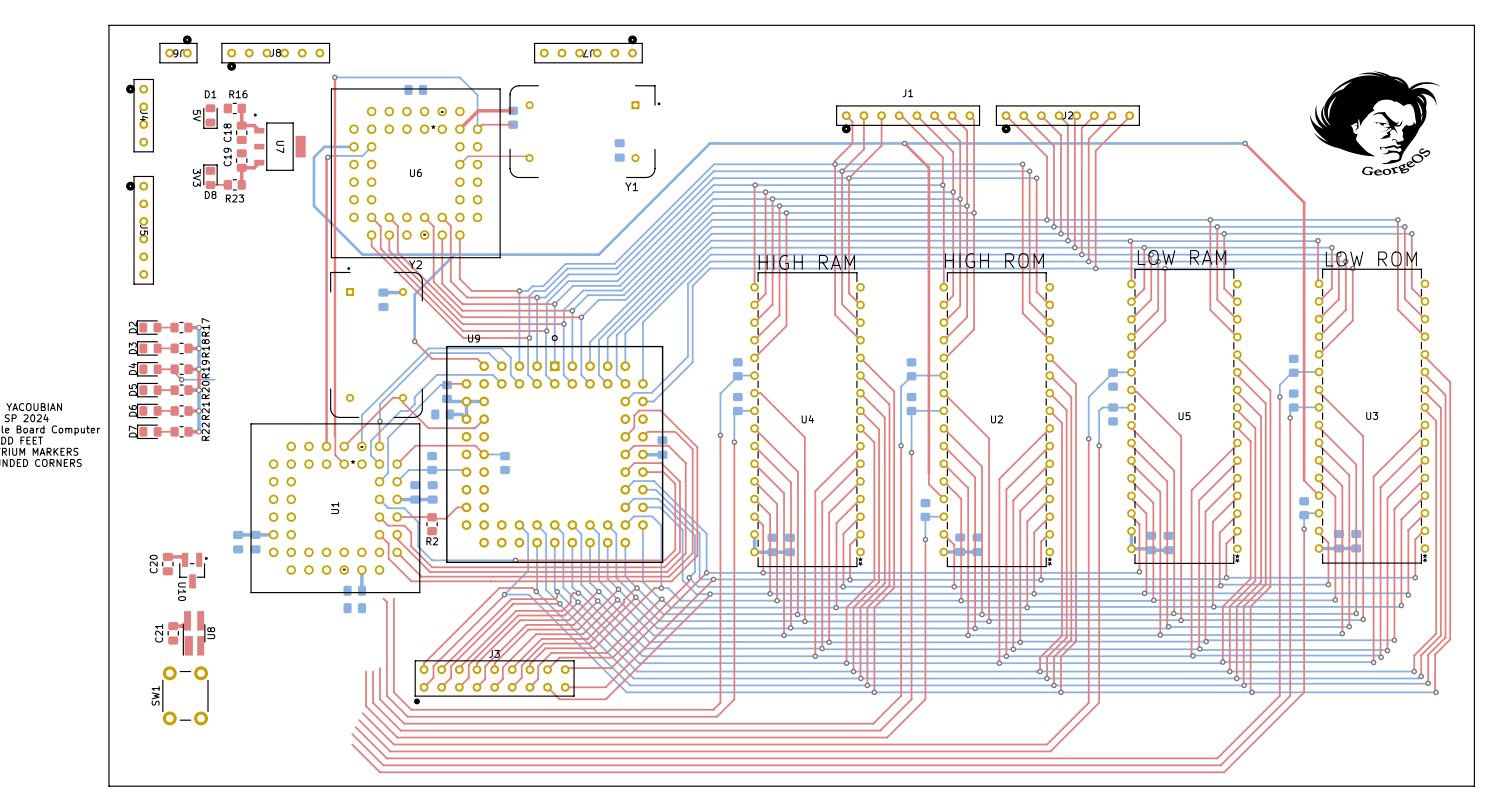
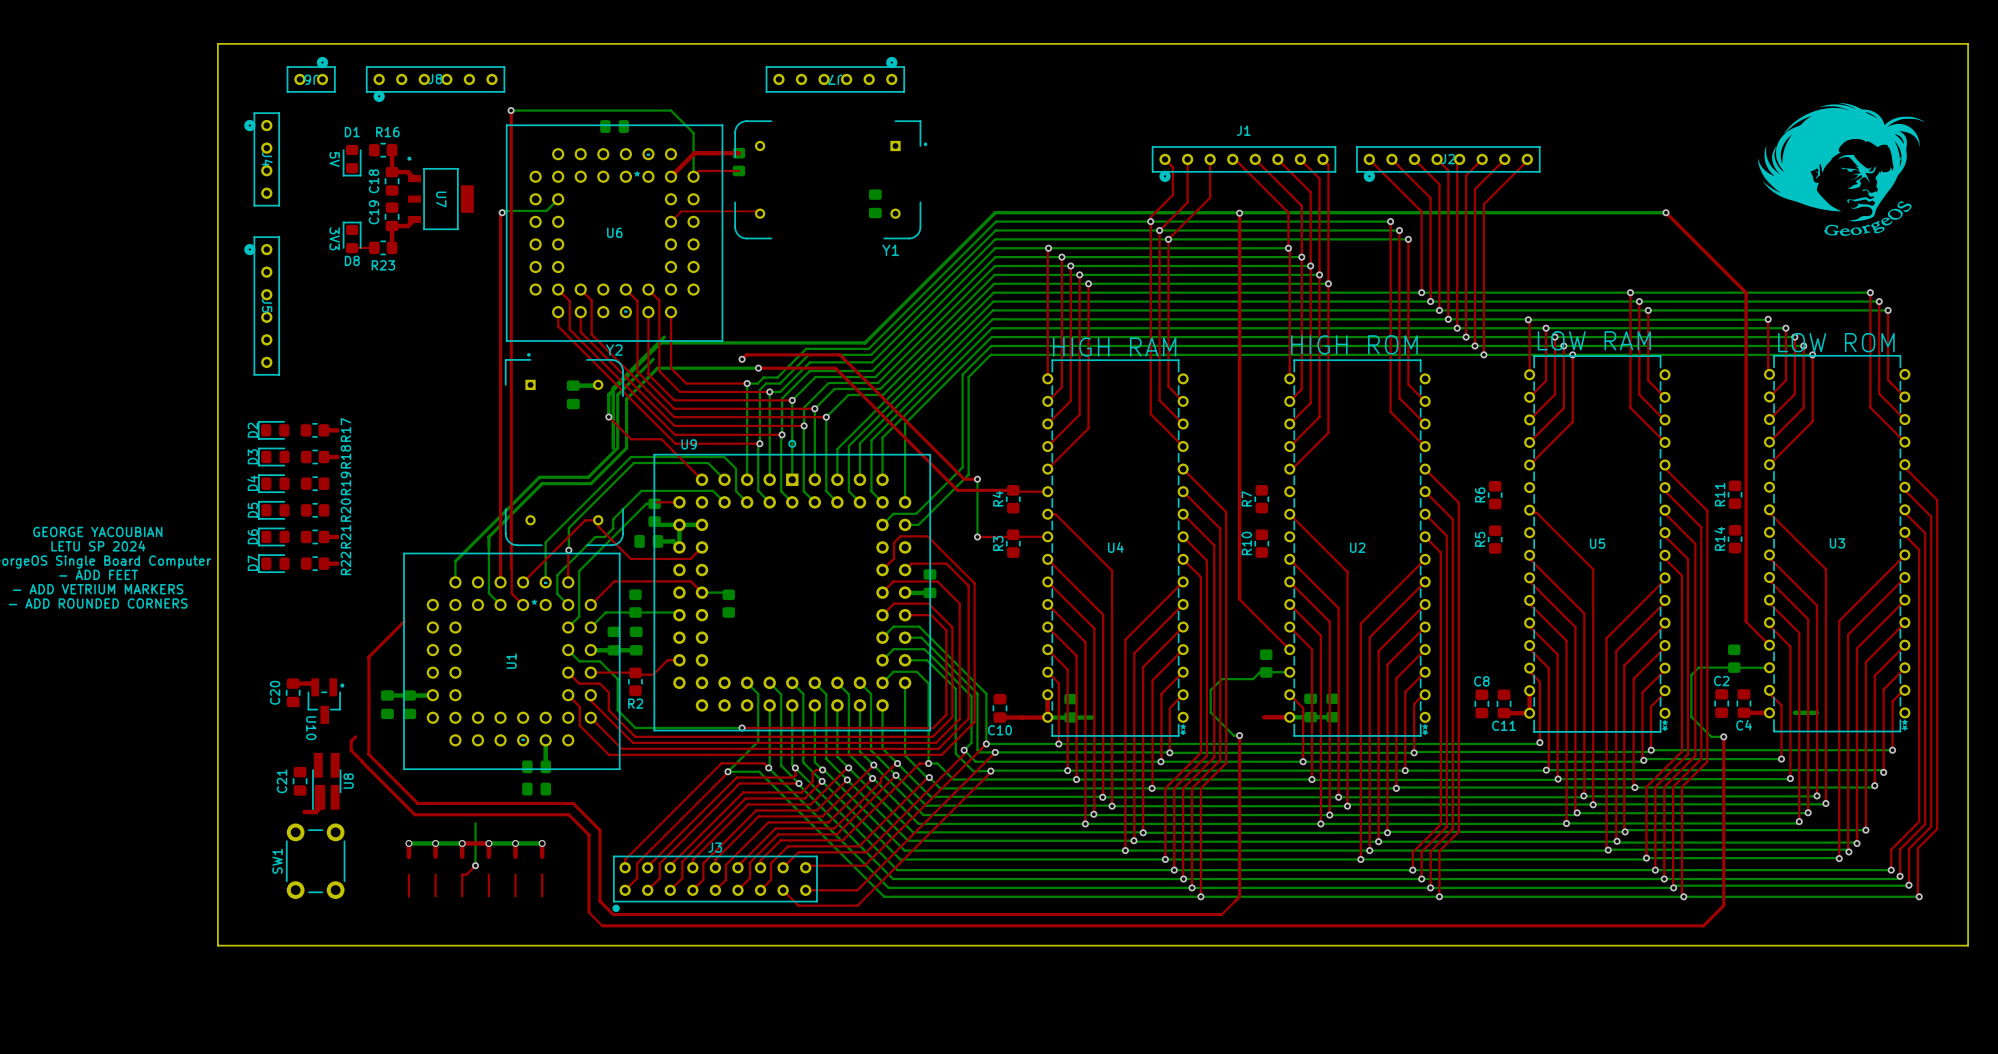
board edge: (108, 25) (108, 786) (1474, 786) (1474, 730) -> (222, 43) (217, 43) (217, 945) (1968, 945)
top track: (904, 143) (928, 167) (928, 484) -> (1239, 213) (1239, 599) (1270, 630)
via position: (904, 143) -> (1239, 213)
top track: (1245, 143) (1304, 202) (1304, 480) -> (1666, 212) (1746, 292) (1746, 621) (1750, 626)
bottom track: (1245, 143) (710, 143) (598, 254) (362, 254) (313, 205) (313, 157) (324, 146) (353, 146) -> none
via position: (1245, 143) -> (1666, 212)
bottom track: none -> (1666, 212) (995, 212) (865, 342) (660, 342) (608, 394) (608, 417)
bottom track: none -> (653, 359) (617, 394) (617, 447) (588, 477) (539, 477) (455, 561) (455, 582)
top track: none -> (742, 359) (746, 354) (839, 354) (964, 479) (977, 479)
via: none -> (742, 359)
top track: none -> (758, 368) (835, 368) (957, 490) (1047, 491)
bottom track: none -> (758, 368) (657, 368) (626, 399) (626, 448) (591, 483) (542, 483) (488, 536) (488, 593) (500, 604)
via: none -> (758, 368)
top track: (157, 327) (174, 327) -> none
bottom track: (198, 327) (198, 369) -> none
via: (198, 327) -> none
top track: (414, 341) (432, 358) (477, 358) (484, 366) -> (608, 417) (631, 439) (661, 439) (702, 479)
via position: (414, 341) -> (608, 417)
top track: (157, 348) (174, 348) -> none
via: (198, 348) -> none
bottom track: none -> (977, 479) (977, 536)
via: none -> (977, 479)
R11 side: bottom (1293, 365) -> top (1735, 494)
top track: (157, 369) (174, 369) (174, 372) (181, 379) -> none
top track: (188, 369) (198, 369) (198, 390) (188, 390) -> none
via: (198, 369) -> none
R4 side: bottom (737, 369) -> top (1013, 499)
R7 side: bottom (911, 369) -> top (1261, 499)
bottom track: (1292, 371) (1319, 372) -> none
bottom track: (1293, 371) (1279, 384) (1279, 397) -> none
bottom track: (1131, 372) (1113, 372) (1088, 397) (1088, 438) -> none
bottom track: (908, 374) (943, 375) -> none
bottom track: (754, 375) (738, 375) (720, 393) (720, 435) -> none
bottom track: (911, 376) (901, 386) (901, 445) -> none
bottom track: (181, 379) (214, 379) -> none
via: (181, 379) -> none
R6 side: bottom (1113, 379) -> top (1495, 495)
top track: (157, 390) (174, 390) -> none
bottom track: (198, 390) (198, 431) -> none
via: (198, 390) -> none
top track: (1279, 397) (1279, 695) (1217, 758) (386, 758) (355, 727) -> none
via: (1279, 397) -> none
R14 side: bottom (1293, 400) -> top (1735, 539)
R3 side: bottom (737, 404) -> top (1013, 543)
R10 side: bottom (911, 404) -> top (1261, 543)
bottom track: (1131, 407) (1102, 407) (1099, 410) (1099, 445) -> none
bottom track: (1319, 407) (1292, 407) (1290, 409) (1290, 417) -> none
top track: (157, 410) (174, 410) -> none
via: (198, 410) -> none
via: none -> (977, 536)
top track: none -> (1047, 536) (1015, 536) (1013, 534) (1011, 536) (977, 536)
bottom track: (754, 410) (737, 410) (734, 414) (734, 442) -> none
bottom track: (911, 410) (911, 452) -> none
bottom track: (943, 410) (911, 410) (908, 414) -> none
R5 side: bottom (1113, 414) -> top (1495, 539)
top track: (1290, 417) (1290, 695) (1220, 765) (383, 765) (352, 734) -> none
via: (1290, 417) -> none
top track: (157, 431) (174, 431) -> none
via: (198, 431) -> none
top track: (720, 435) (720, 702) (713, 709) (411, 709) (393, 692) (393, 598) -> none
via: (720, 435) -> none
top track: (1088, 438) (1088, 702) (1047, 744) (393, 744) (362, 713) -> none
via: (1088, 438) -> none
top track: (734, 442) (734, 699) (716, 716) (407, 716) (406, 715) -> (1723, 736) (1723, 905) (1703, 925) (602, 925)
via: (734, 442) -> none
top track: (901, 445) (901, 695) -> (1239, 735) (1239, 896) (1235, 901)
via: (901, 445) -> none
top track: (1099, 445) (1099, 702) (1050, 751) (390, 751) (359, 720) -> none
via: (1099, 445) -> none
top track: (911, 452) (911, 699) (880, 730) (400, 730) (373, 702) (373, 671) -> none
via: (911, 452) -> none
part position: (1304, 508) -> (1734, 658)
bottom track: (1306, 513) (1304, 515) (1304, 529) -> (1752, 667) (1698, 667) (1691, 675) (1691, 716) (1711, 736) (1723, 736)
bottom track: (925, 516) (925, 539) -> (1266, 672) (1260, 672) (1253, 679) (1221, 679) (1210, 690) (1210, 712) (1233, 735) (1239, 735)
top track: (1304, 529) (1304, 692) (1224, 772) (379, 772) (352, 744) -> none
via: (1304, 529) -> none
top track: none -> (1529, 690) (1529, 713) (1504, 713)
bottom track: (1131, 531) (1131, 548) (1168, 550) -> none
top track: none -> (1047, 694) (1047, 717) (999, 717)
top track: (925, 539) (925, 699) (887, 737) (397, 737) (366, 706) (366, 671) -> none
via position: (925, 539) -> (1239, 735)
C4 side: bottom (1338, 541) -> top (1743, 703)
C2 side: bottom (1356, 541) -> top (1721, 703)
C11 side: bottom (1151, 542) -> top (1504, 703)
C8 side: bottom (1168, 542) -> top (1481, 703)
C10 side: bottom (789, 544) -> top (999, 708)
top track: none -> (1744, 712) (1769, 712)
bottom track: (1319, 548) (1338, 548) -> none
top track: none -> (1264, 717) (1289, 717)
top track: (167, 556) (182, 556) (185, 559) -> (293, 683) (311, 683) (315, 687)
C20 position: (167, 564) -> (293, 692)
via: none -> (1723, 736)
U10 position: (193, 570) -> (325, 701)
top track: (383, 598) (386, 602) (386, 695) (395, 704) -> (355, 736) (351, 741) (351, 750) (414, 814) (568, 814) (588, 834) (588, 912)
C21 position: (173, 633) -> (300, 781)
U8 position: (194, 633) -> (326, 781)
bottom track: none -> (475, 823) (475, 865)
top track: none -> (408, 843) (408, 857)
bottom track: none -> (408, 843) (462, 843)
via: none -> (408, 843)
top track: none -> (435, 843) (435, 856)
via: none -> (435, 843)
via: none -> (462, 843)
bottom track: none -> (488, 843) (542, 843)
via: none -> (488, 843)
top track: none -> (515, 843) (515, 856)
via: none -> (515, 843)
top track: none -> (542, 843) (542, 856)
via: none -> (542, 843)
top track: none -> (462, 856) (462, 843) (488, 843) (488, 856)
top track: none -> (475, 865) (466, 874) (462, 874) (462, 896)
via: none -> (475, 865)
top track: (379, 668) (379, 699) (404, 723) (873, 723) (890, 706) -> (404, 621) (368, 656) (368, 754) (417, 803) (573, 803) (599, 830) (599, 901) (613, 914) (1221, 914)
top track: none -> (408, 874) (408, 896)
top track: none -> (435, 874) (435, 896)
top track: none -> (488, 874) (488, 896)
top track: none -> (515, 874) (515, 896)
top track: none -> (542, 874) (542, 896)
SW1 position: (185, 695) -> (315, 861)

